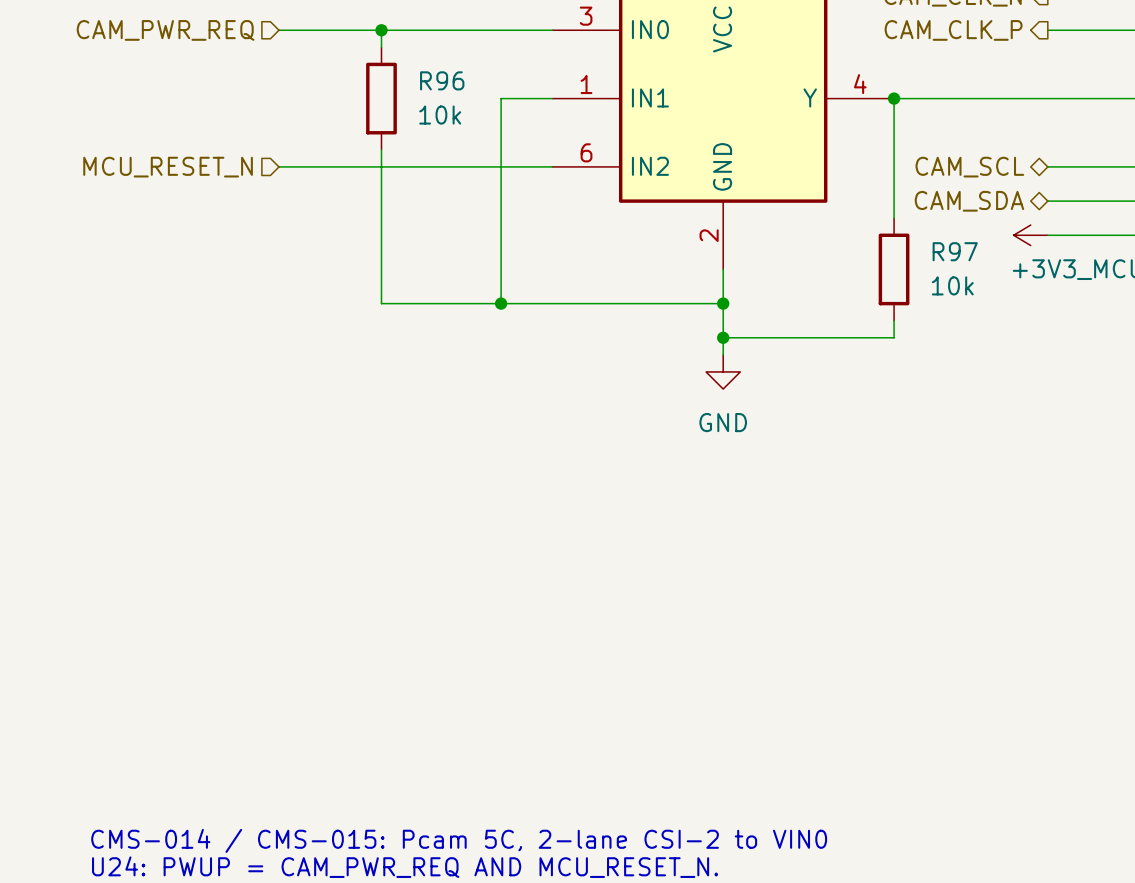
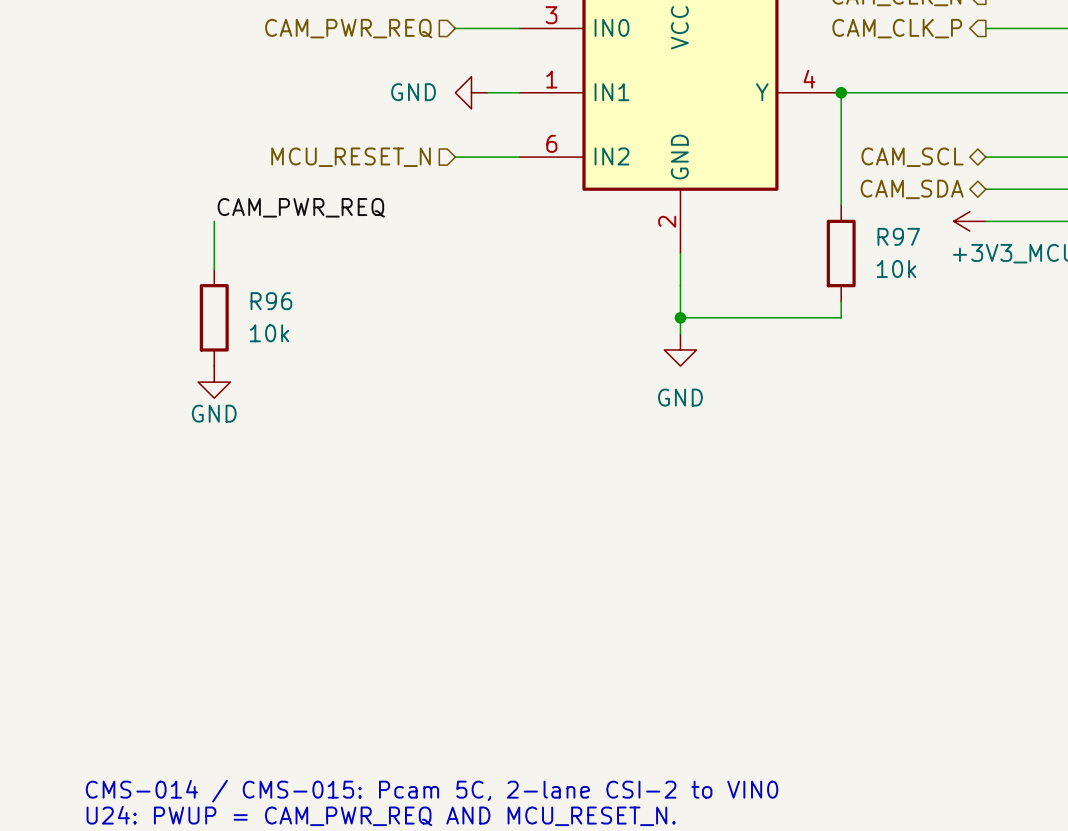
hierarchical label position: CAM_PWR_REQ (165, 30) -> CAM_PWR_REQ (348, 28)
wire: (278, 30) (484, 30) -> none
wire: (381, 30) (381, 47) -> none
junction: (381, 30) -> none
R96 position: (381, 98) -> (214, 317)
power symbol: none -> GND (471, 92)
wire: (518, 98) (501, 98) (501, 303) -> none
wire: (381, 149) (381, 303) (723, 303) -> none
wire: (278, 166) (484, 166) -> none
hierarchical label position: MCU_RESET_N (168, 167) -> MCU_RESET_N (351, 157)
label: none -> CAM_PWR_REQ (301, 207)
wire: none -> (214, 221) (214, 269)
junction: (501, 303) -> none
junction: (723, 303) -> none
power symbol: none -> GND (214, 382)

